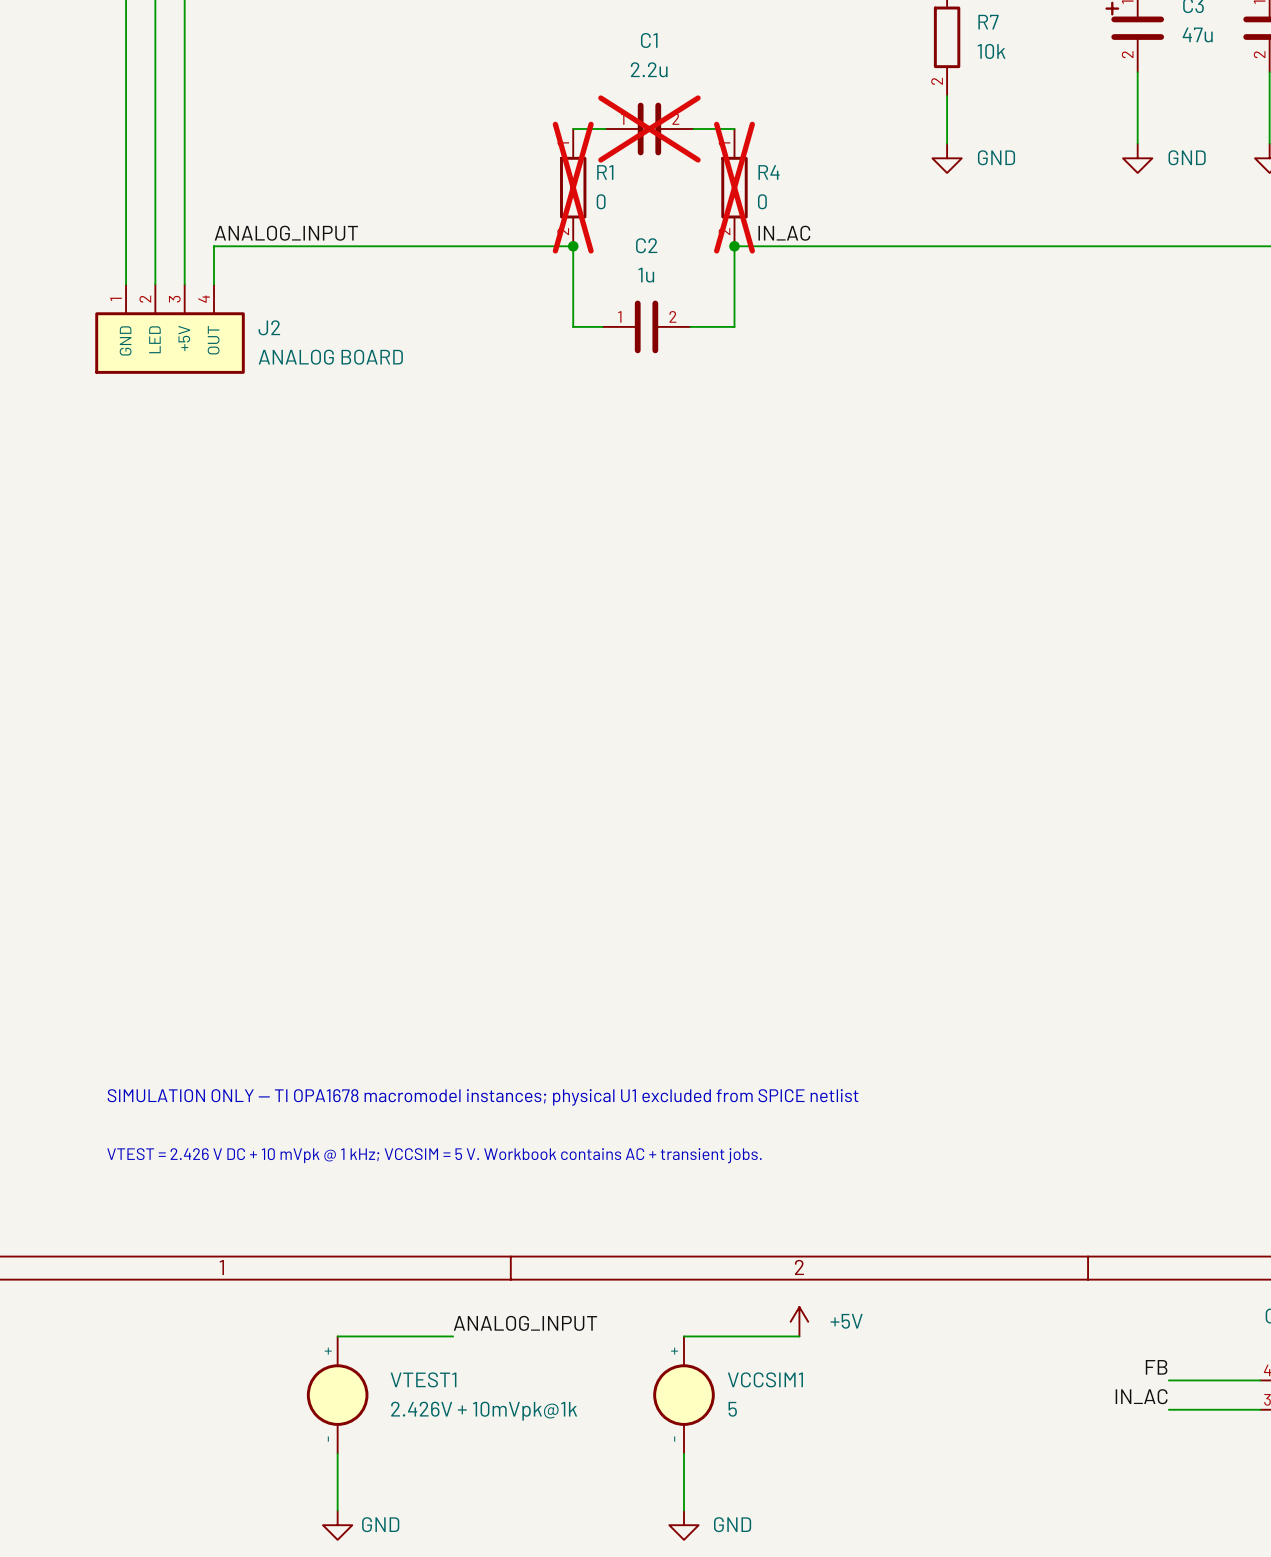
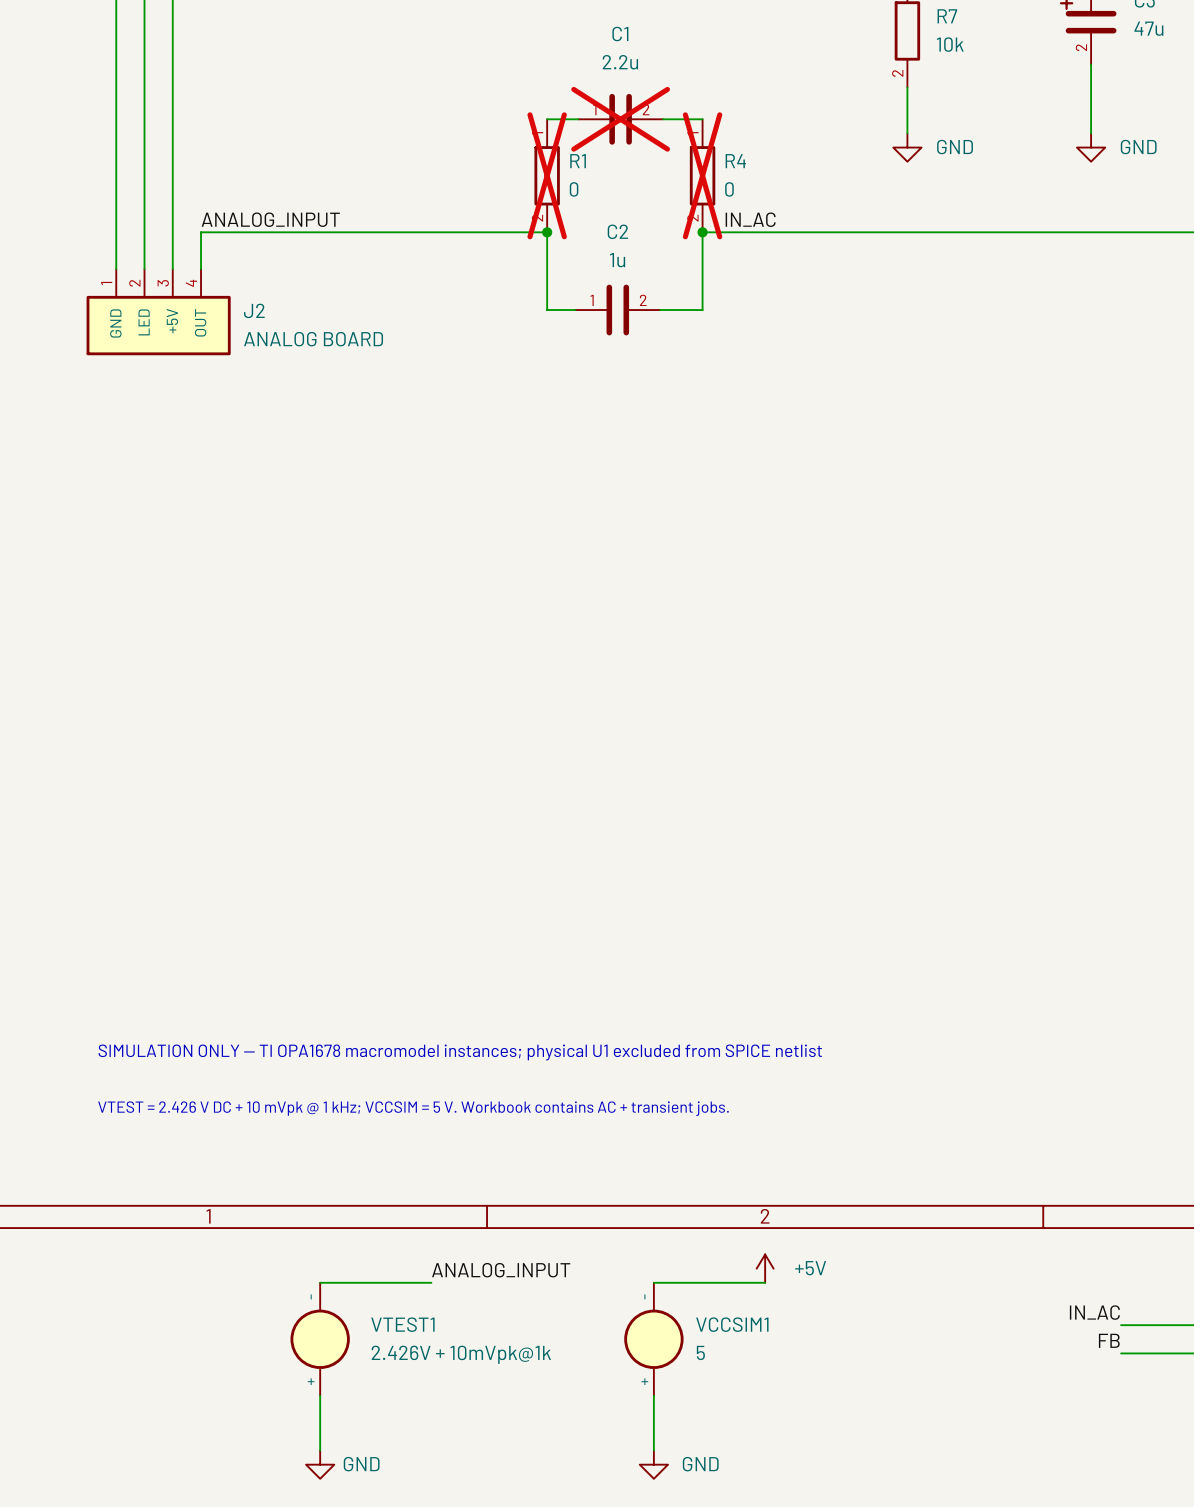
label: FB (1156, 1367) -> IN_AC (1094, 1312)
VTEST1 rotation: 0° (337, 1395) -> 180° (320, 1339)
VCCSIM1 rotation: 0° (683, 1395) -> 180° (653, 1339)
label: IN_AC (1141, 1396) -> FB (1109, 1340)

